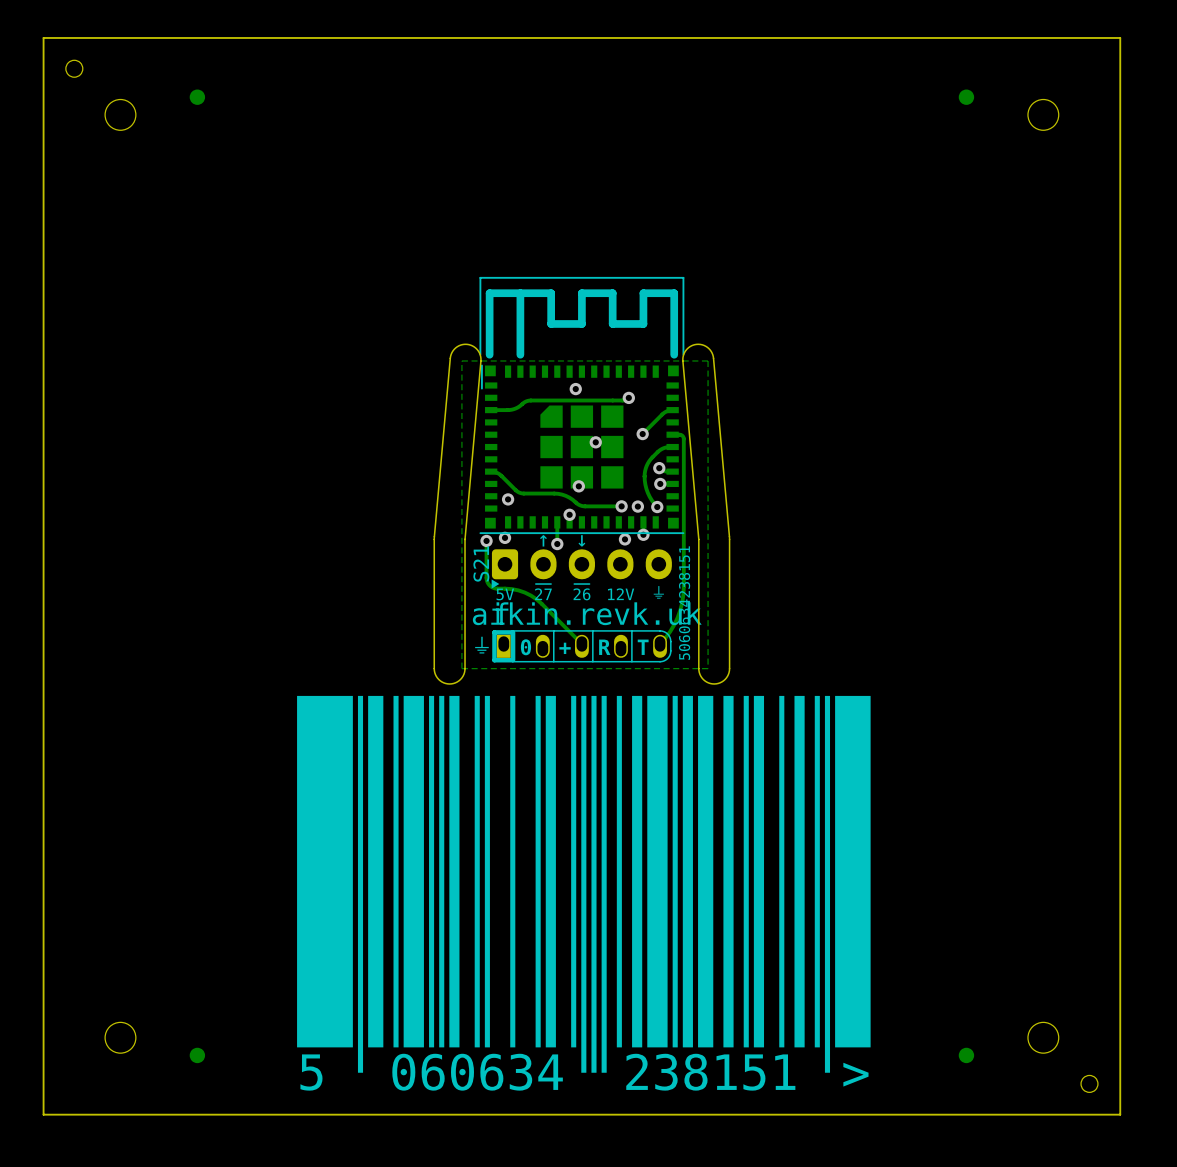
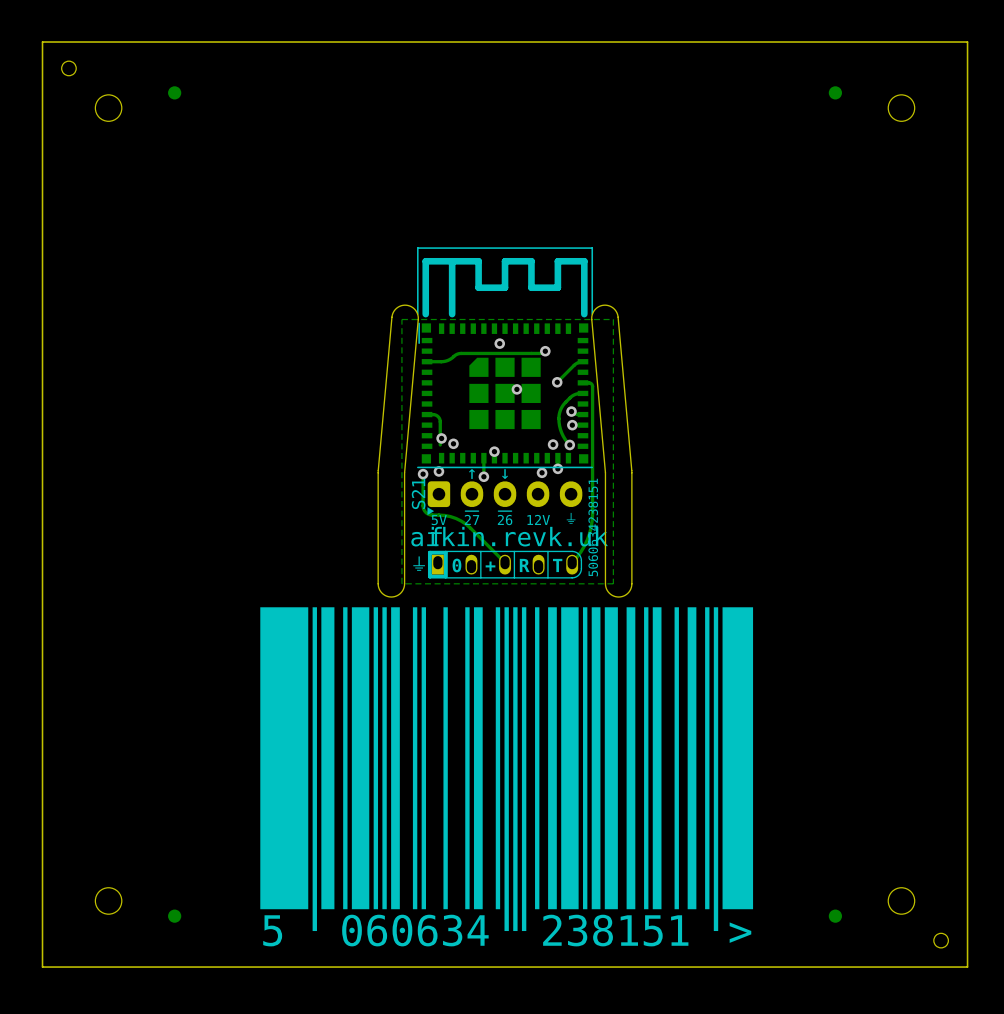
track: (491, 471) (499, 474) (520, 493) (562, 494) (583, 506) (621, 506) -> (427, 414) (435, 414) (439, 418) (440, 444)
via: (578, 486) -> none
via: none -> (453, 443)
via: (621, 506) -> none

